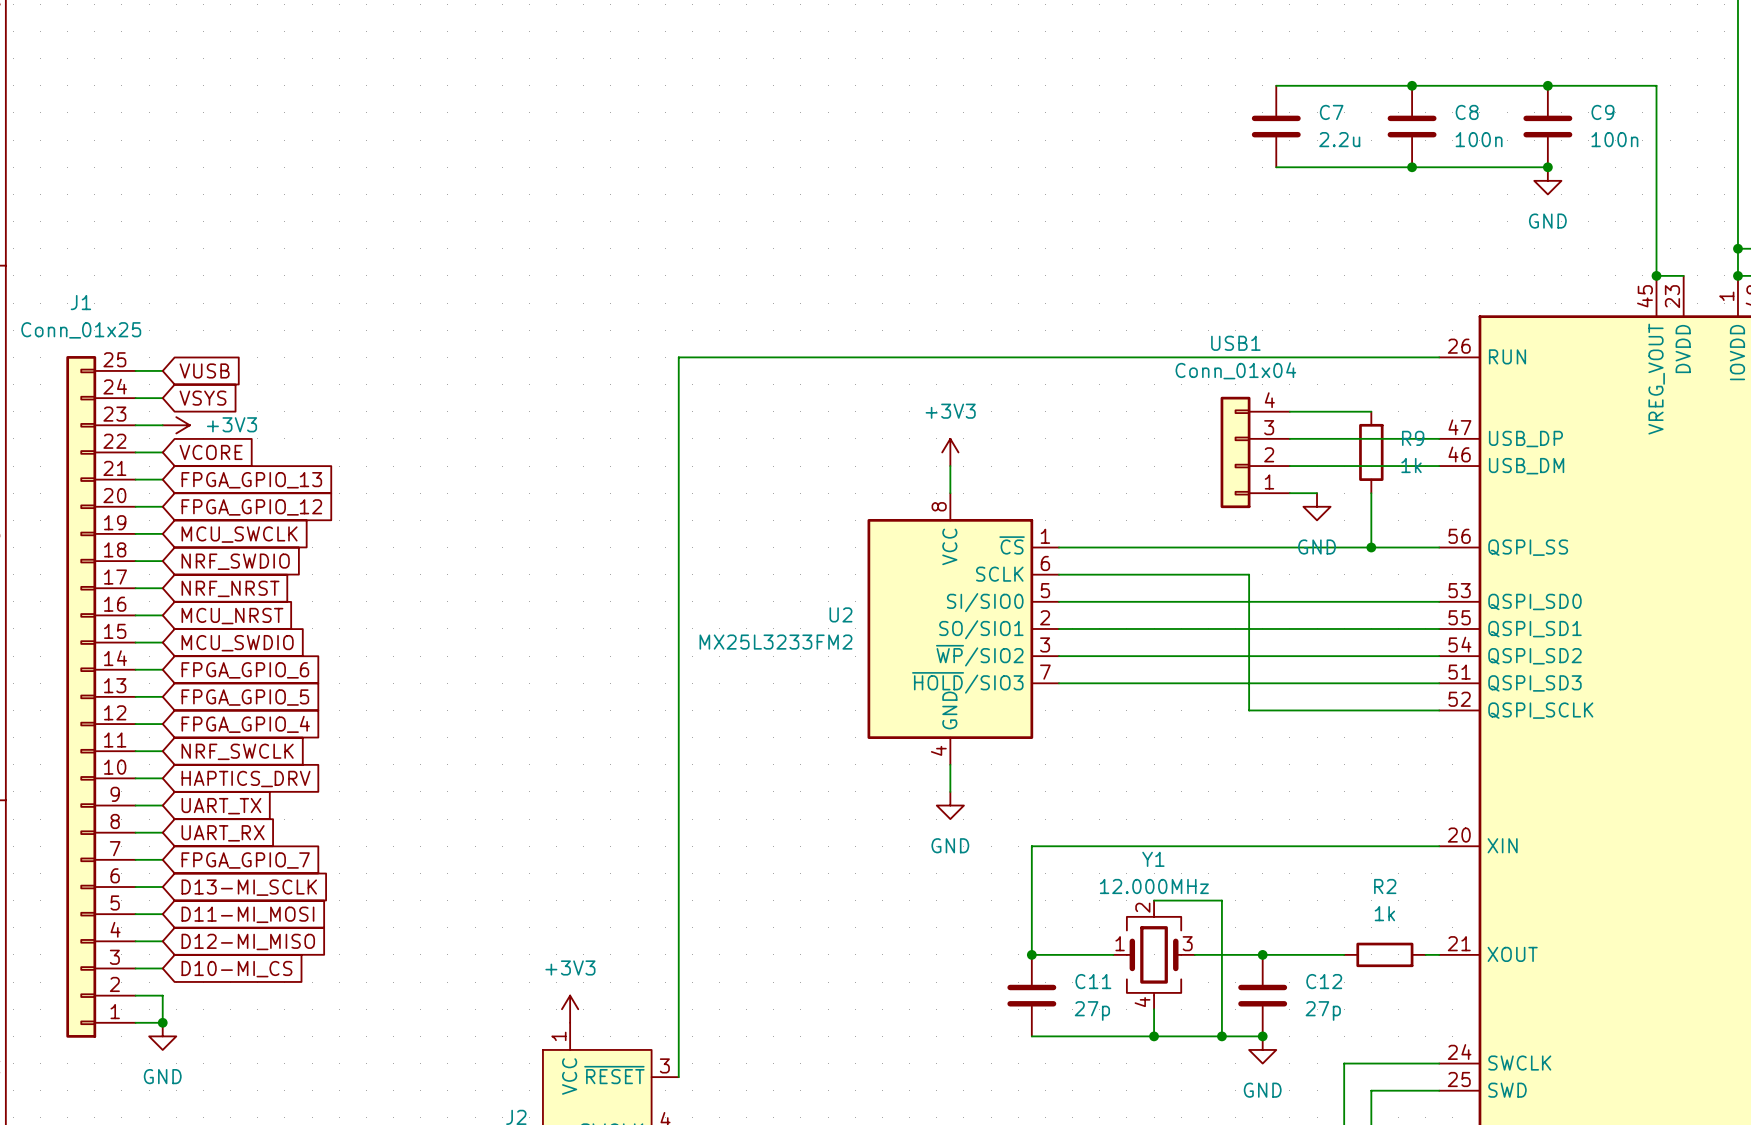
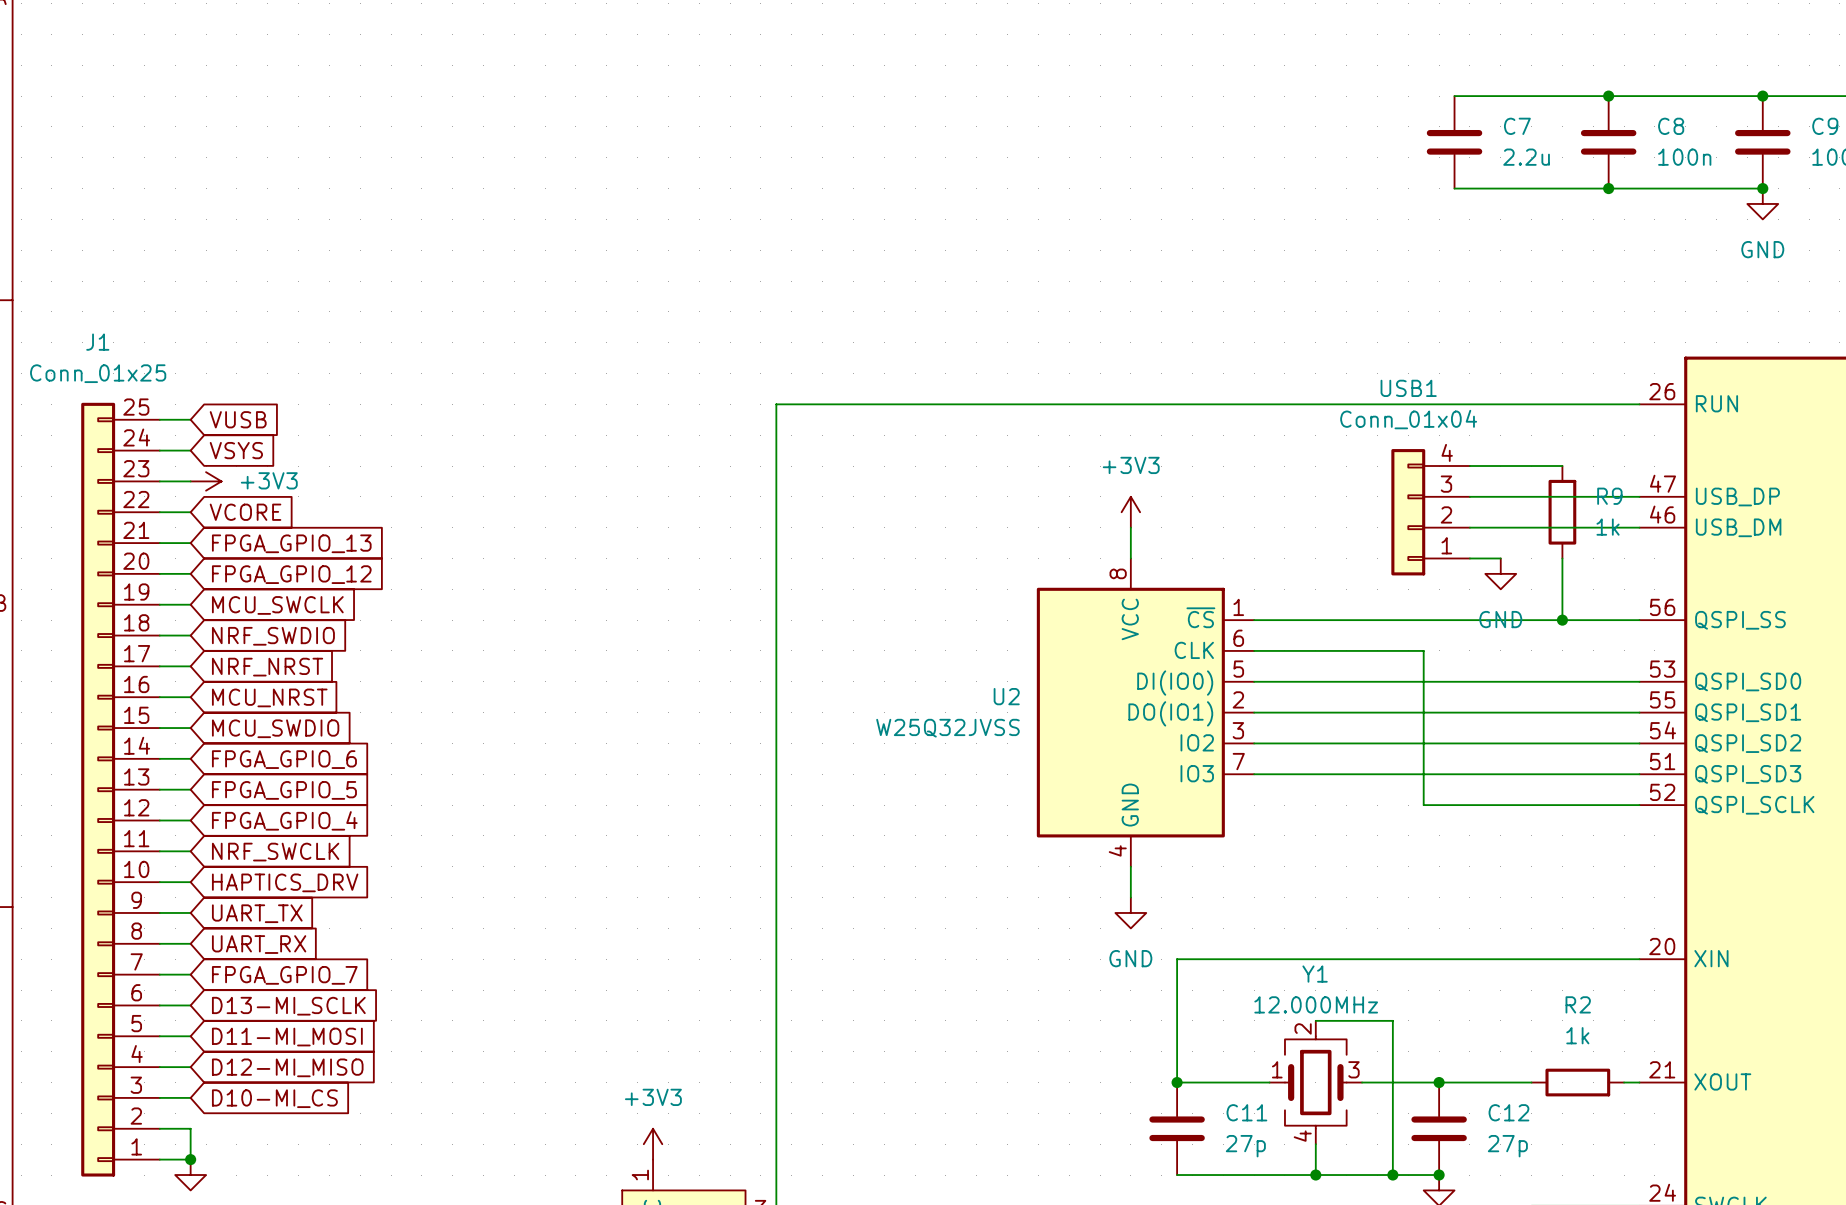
power symbol position: +3V3 (950, 452) -> +3V3 (1130, 512)
wire: (950, 466) (950, 493) -> (1130, 527) (1130, 558)
U2 pin name: SCLK (999, 574) -> CLK (1194, 650)
U2 pin name: SI/SIO0 (985, 602) -> DI(IO0) (1175, 683)
U2 position: (963, 628) -> (1145, 712)
U2 pin name: SO/SIO1 (981, 629) -> DO(IO1) (1170, 713)
U2 value: MX25L3233FM2 (775, 642) -> W25Q32JVSS (947, 728)
U2 pin name: ~{WP}/SIO2 (979, 655) -> IO2 (1197, 742)
U2 pin name: ~{HOLD}/SIO3 (967, 682) -> IO3 (1197, 773)
wire: (950, 764) (950, 791) -> (1130, 866) (1130, 897)
power symbol position: GND (950, 805) -> GND (1130, 912)

